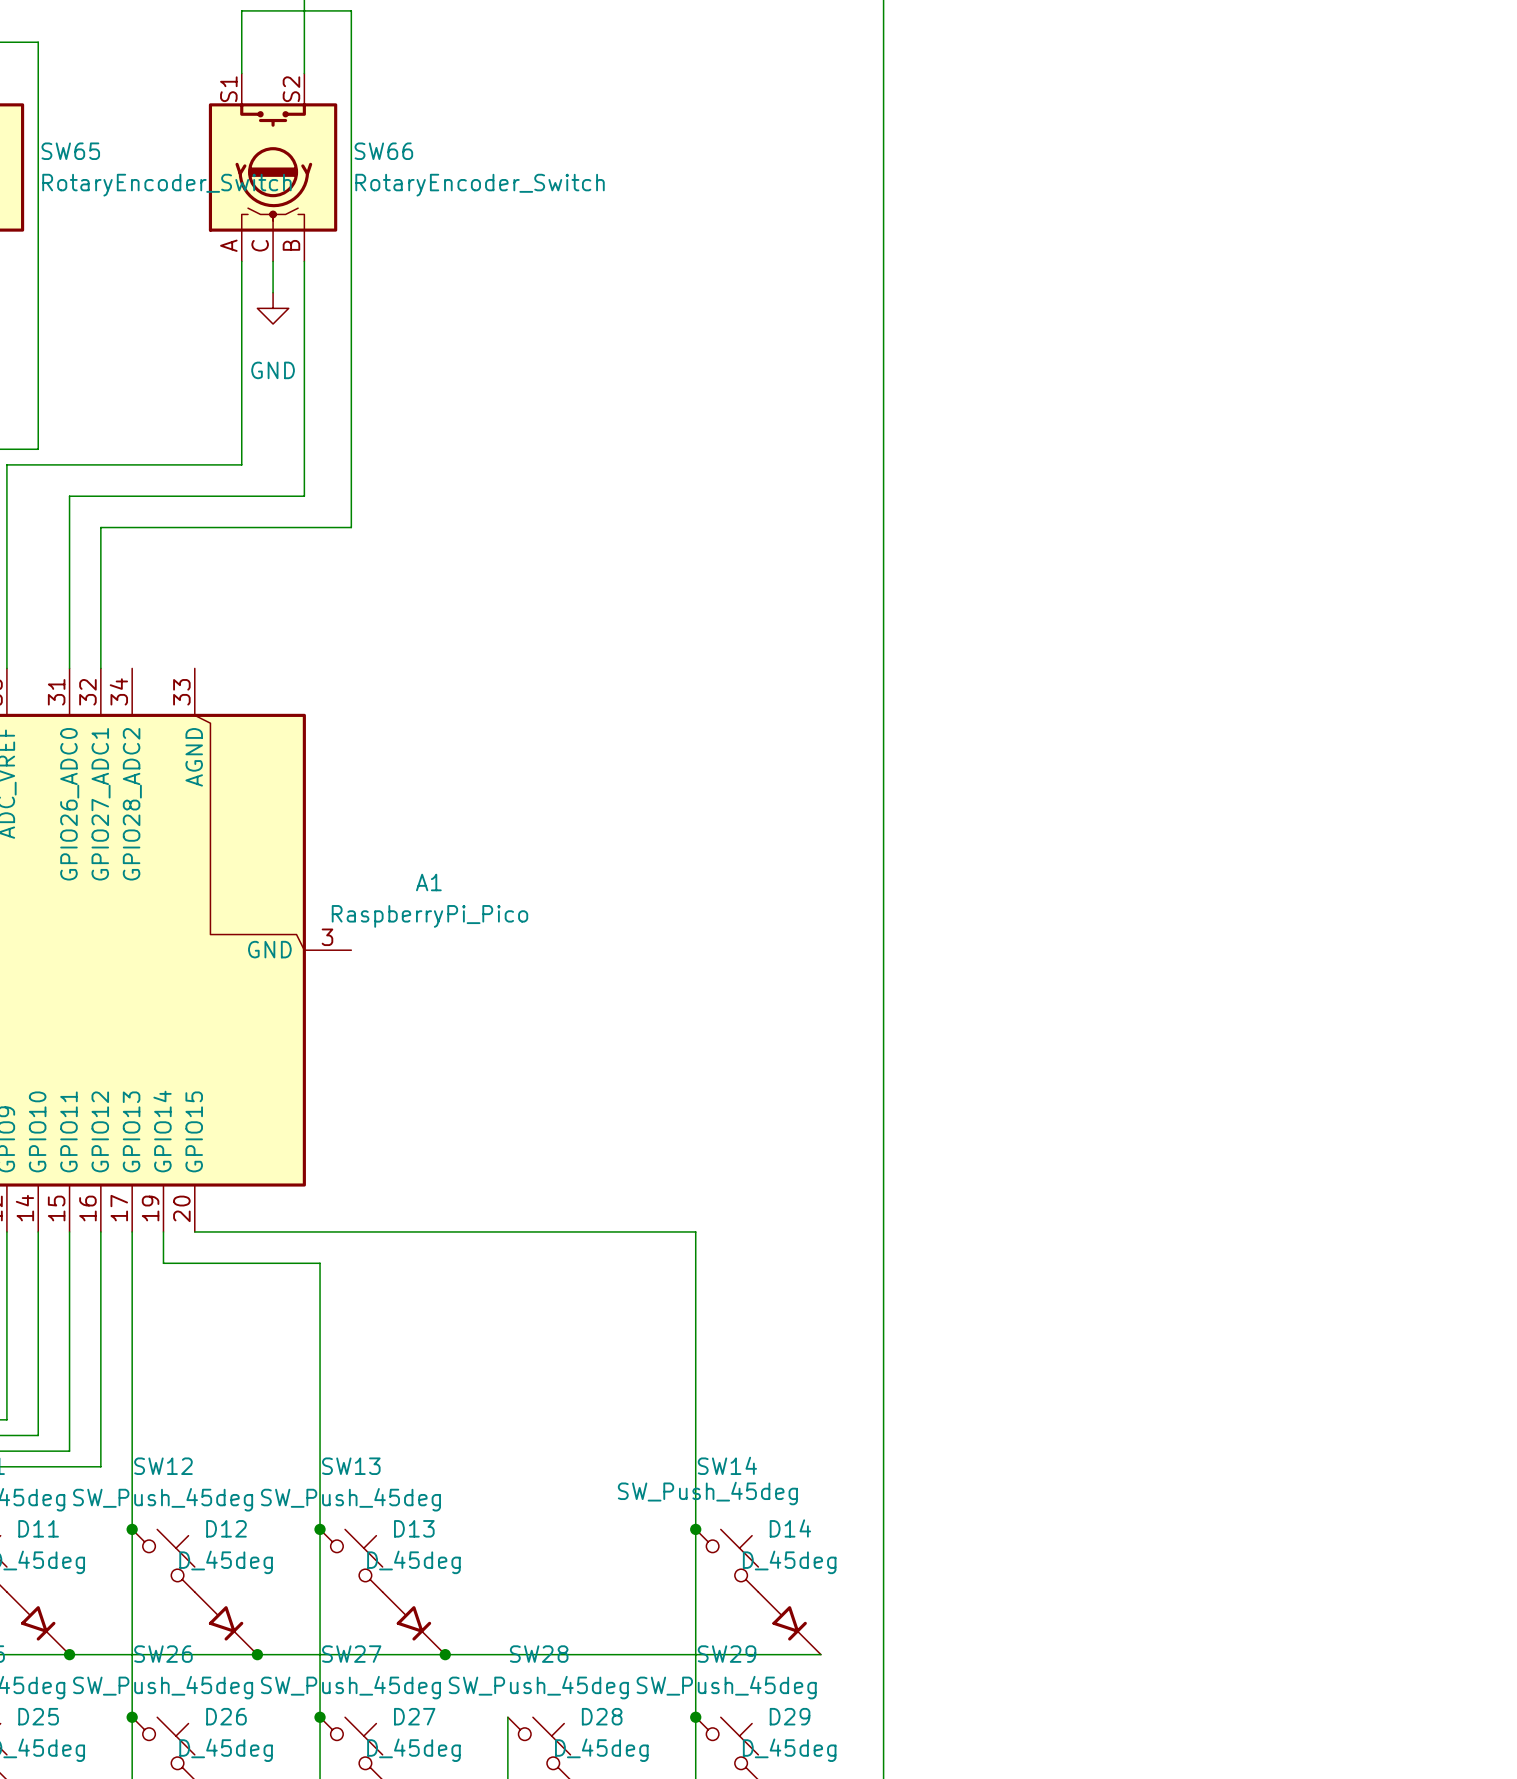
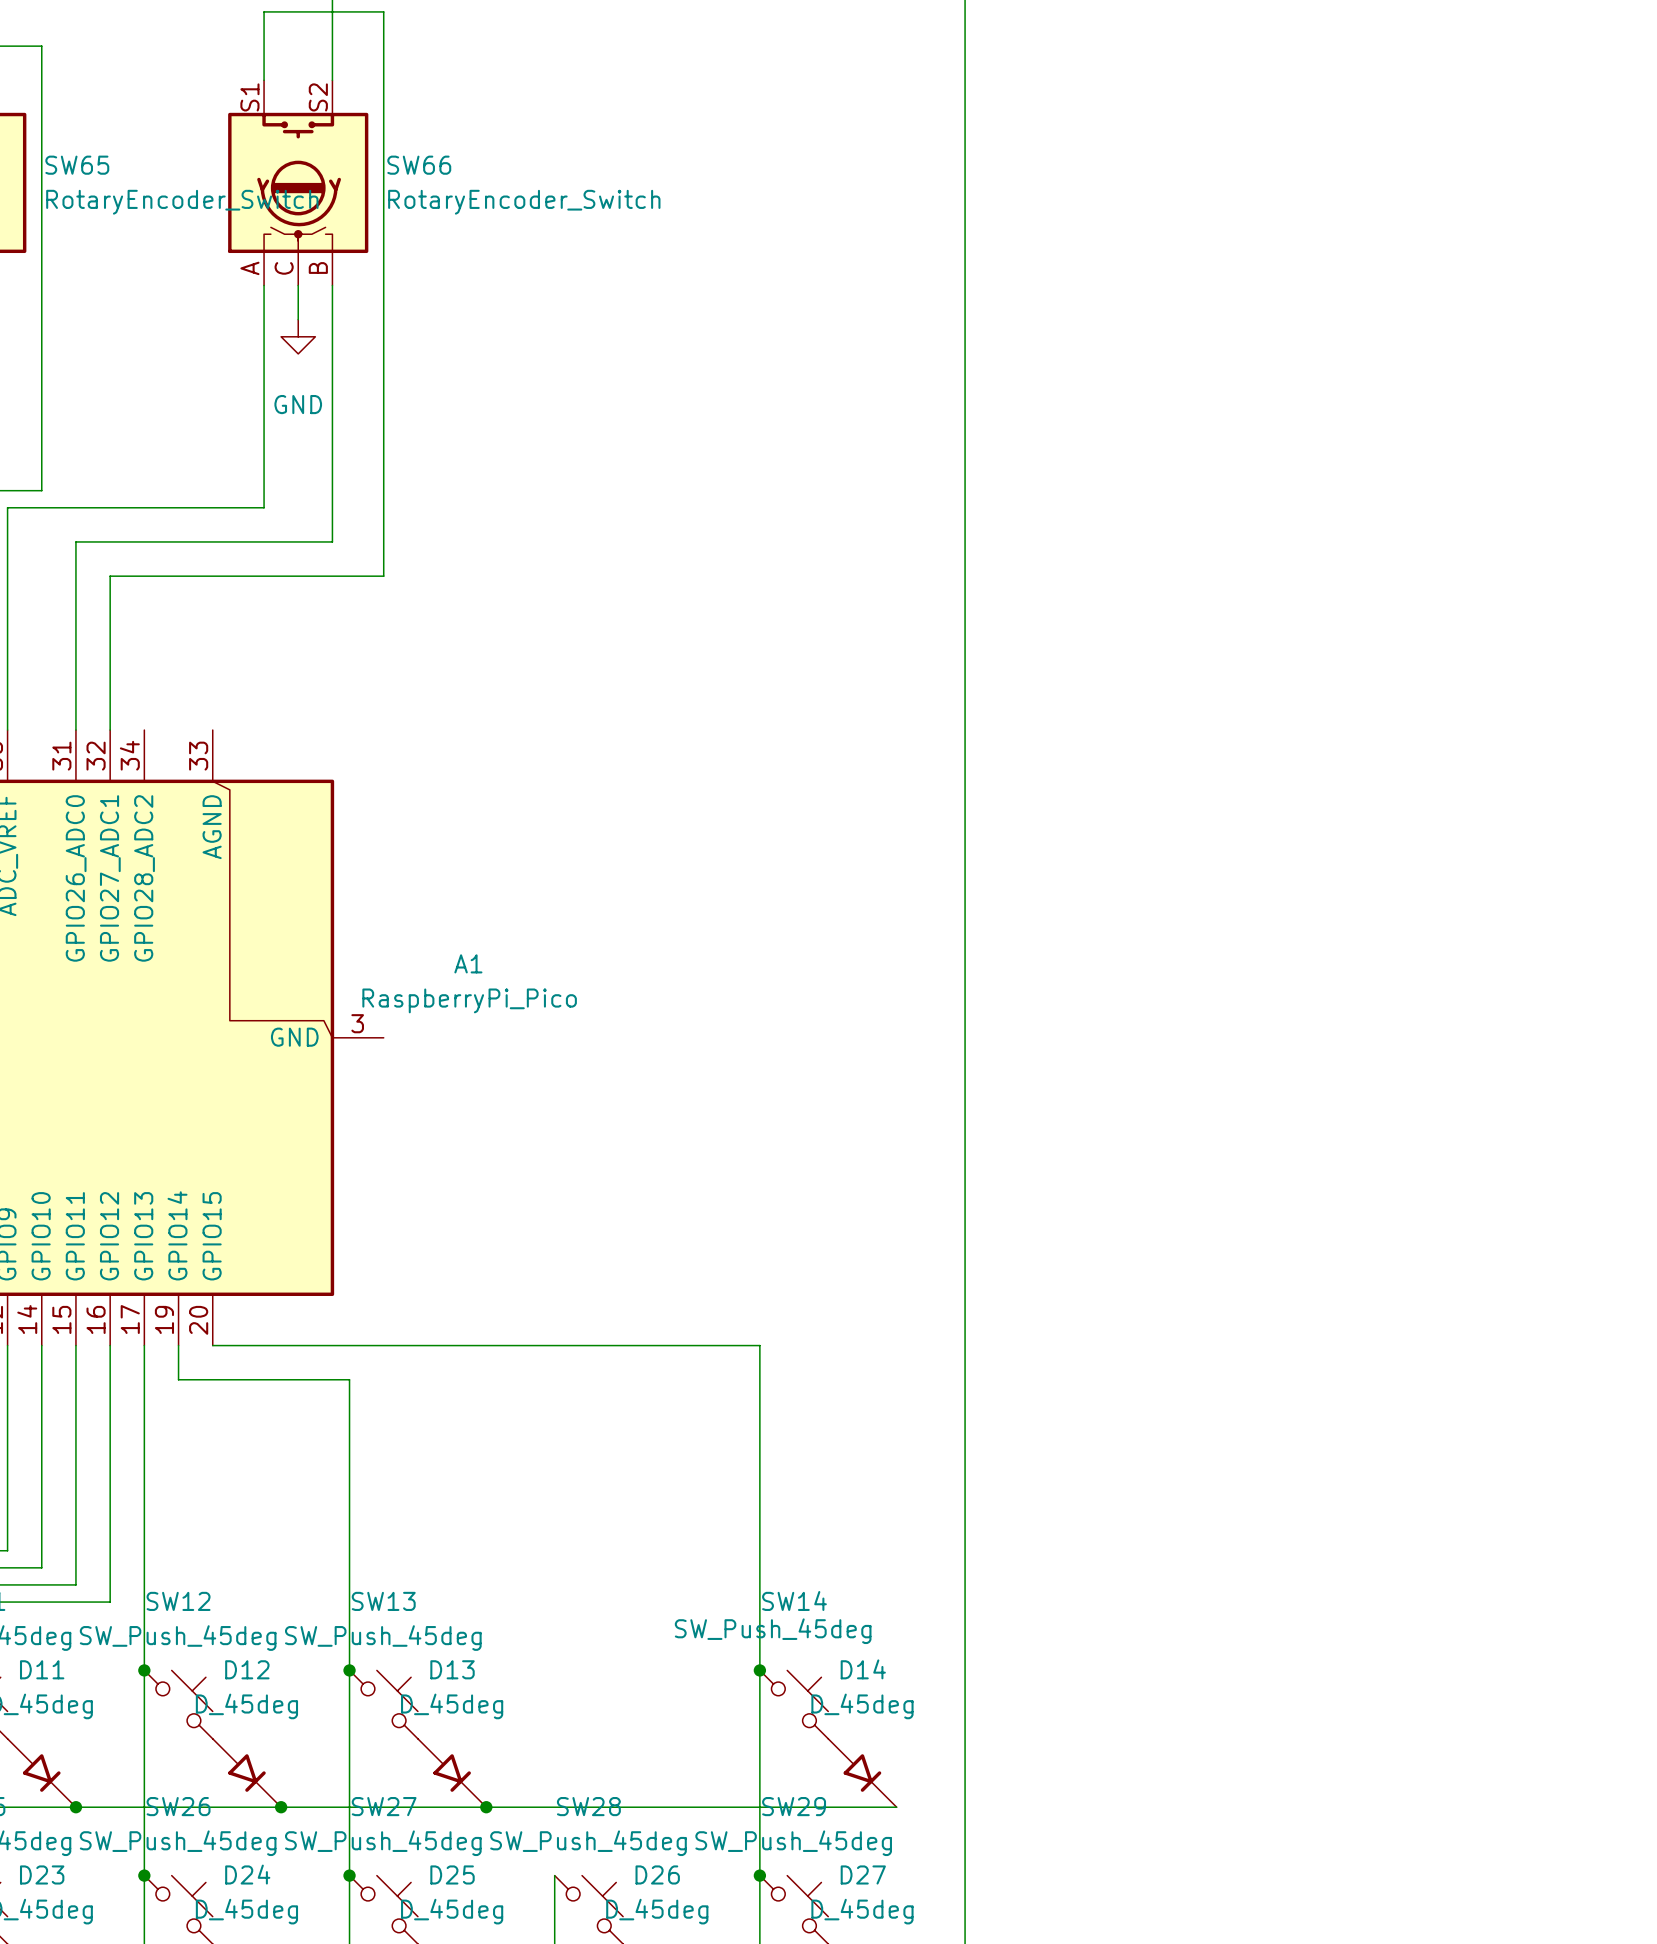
D25 name: D25 (38, 1716) -> D23 (42, 1874)
D26 name: D26 (226, 1716) -> D24 (247, 1874)
D27 name: D27 (414, 1716) -> D25 (452, 1874)
D28 name: D28 (602, 1716) -> D26 (657, 1874)
D29 name: D29 (790, 1716) -> D27 (863, 1874)

